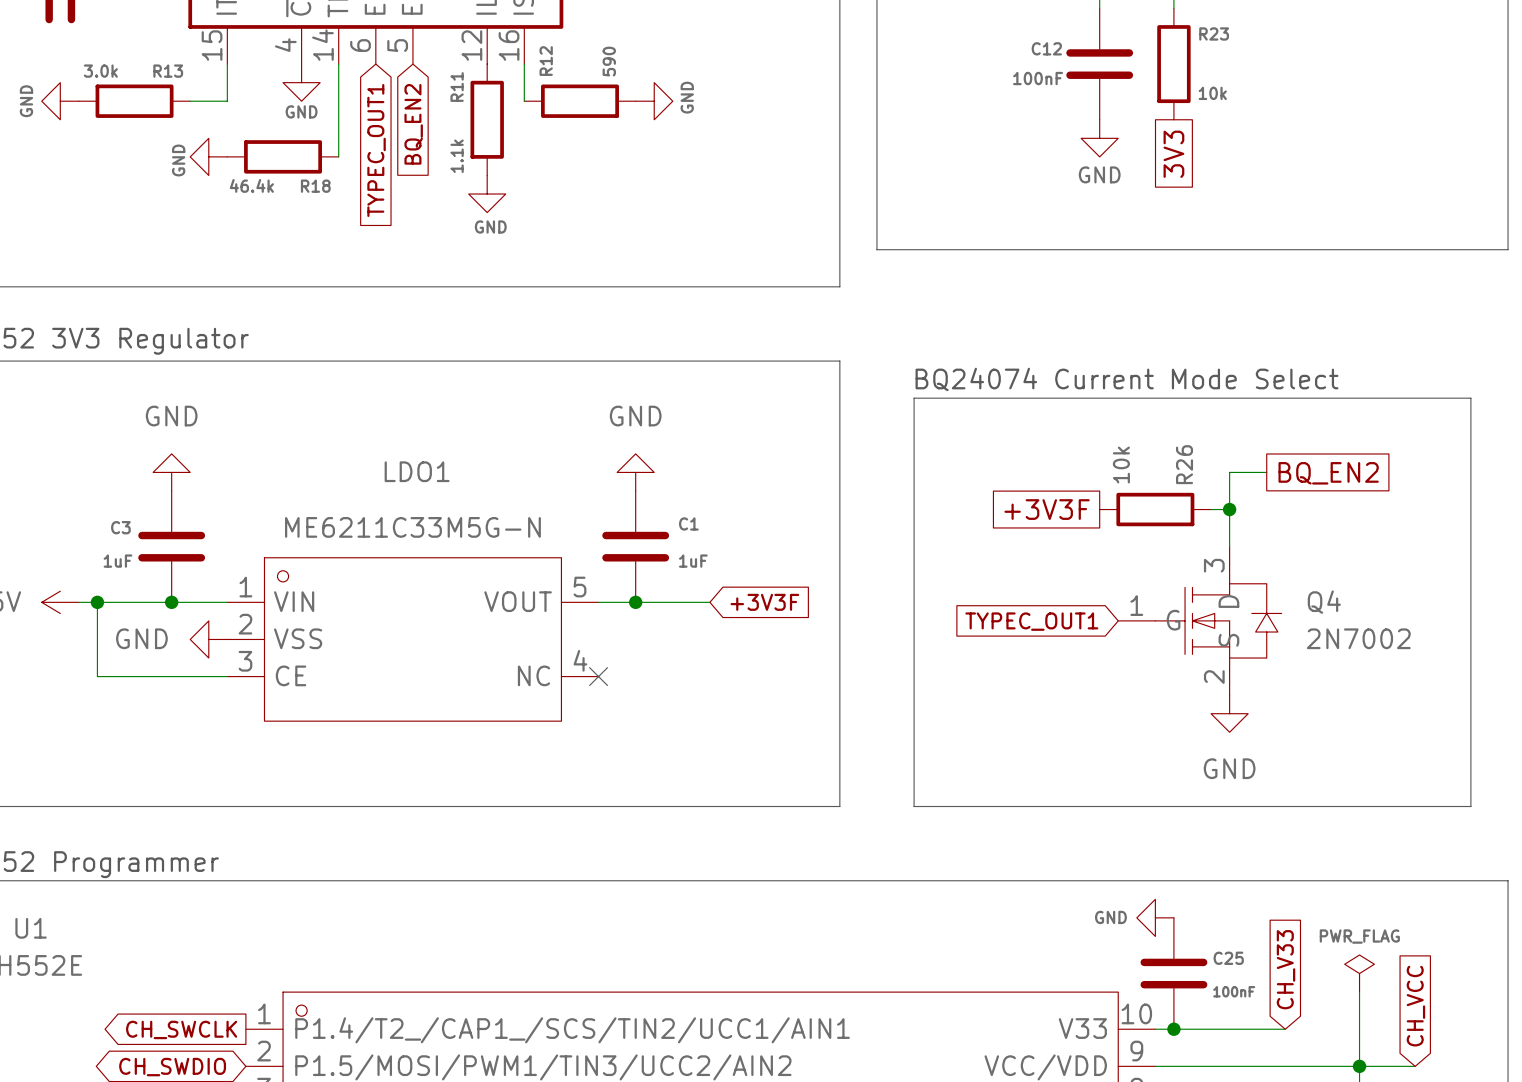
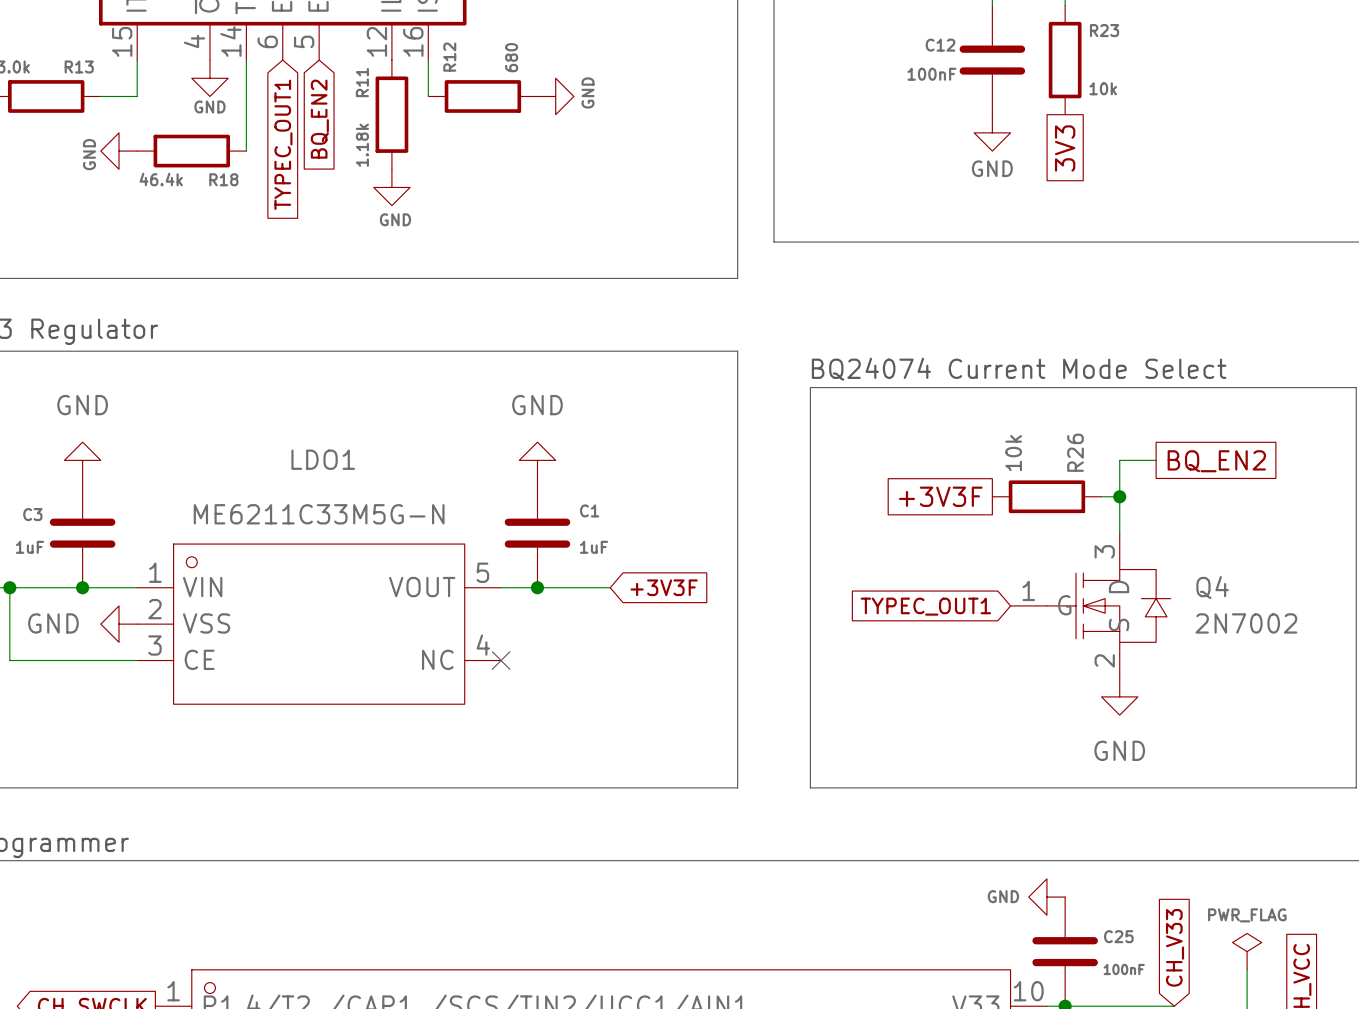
R12 value: 590 (609, 61) -> 680 (511, 57)
R11 value: 1.1k (457, 156) -> 1.18k (362, 145)

